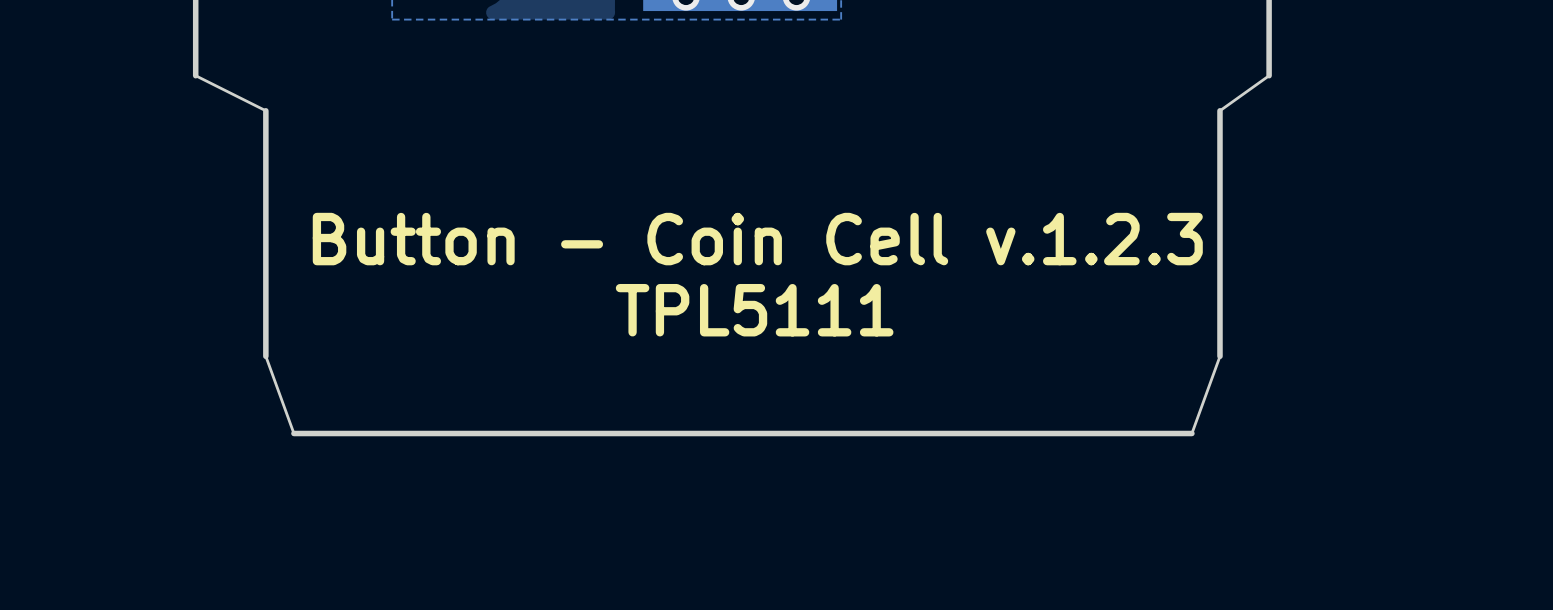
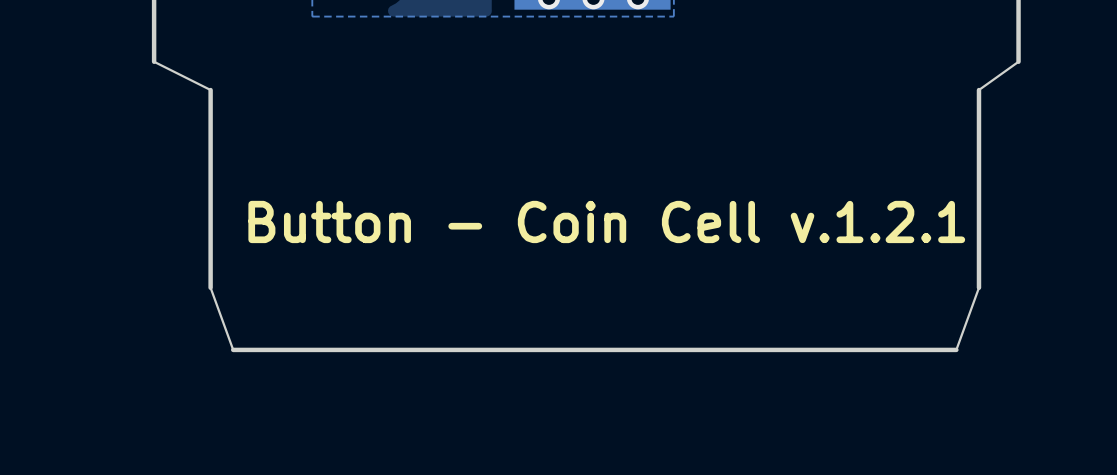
text: Button - Coin Cell v.1.2.3 (757, 239) -> Button - Coin Cell v.1.2.1 (606, 221)
text: TPL5111 (754, 310) -> none

